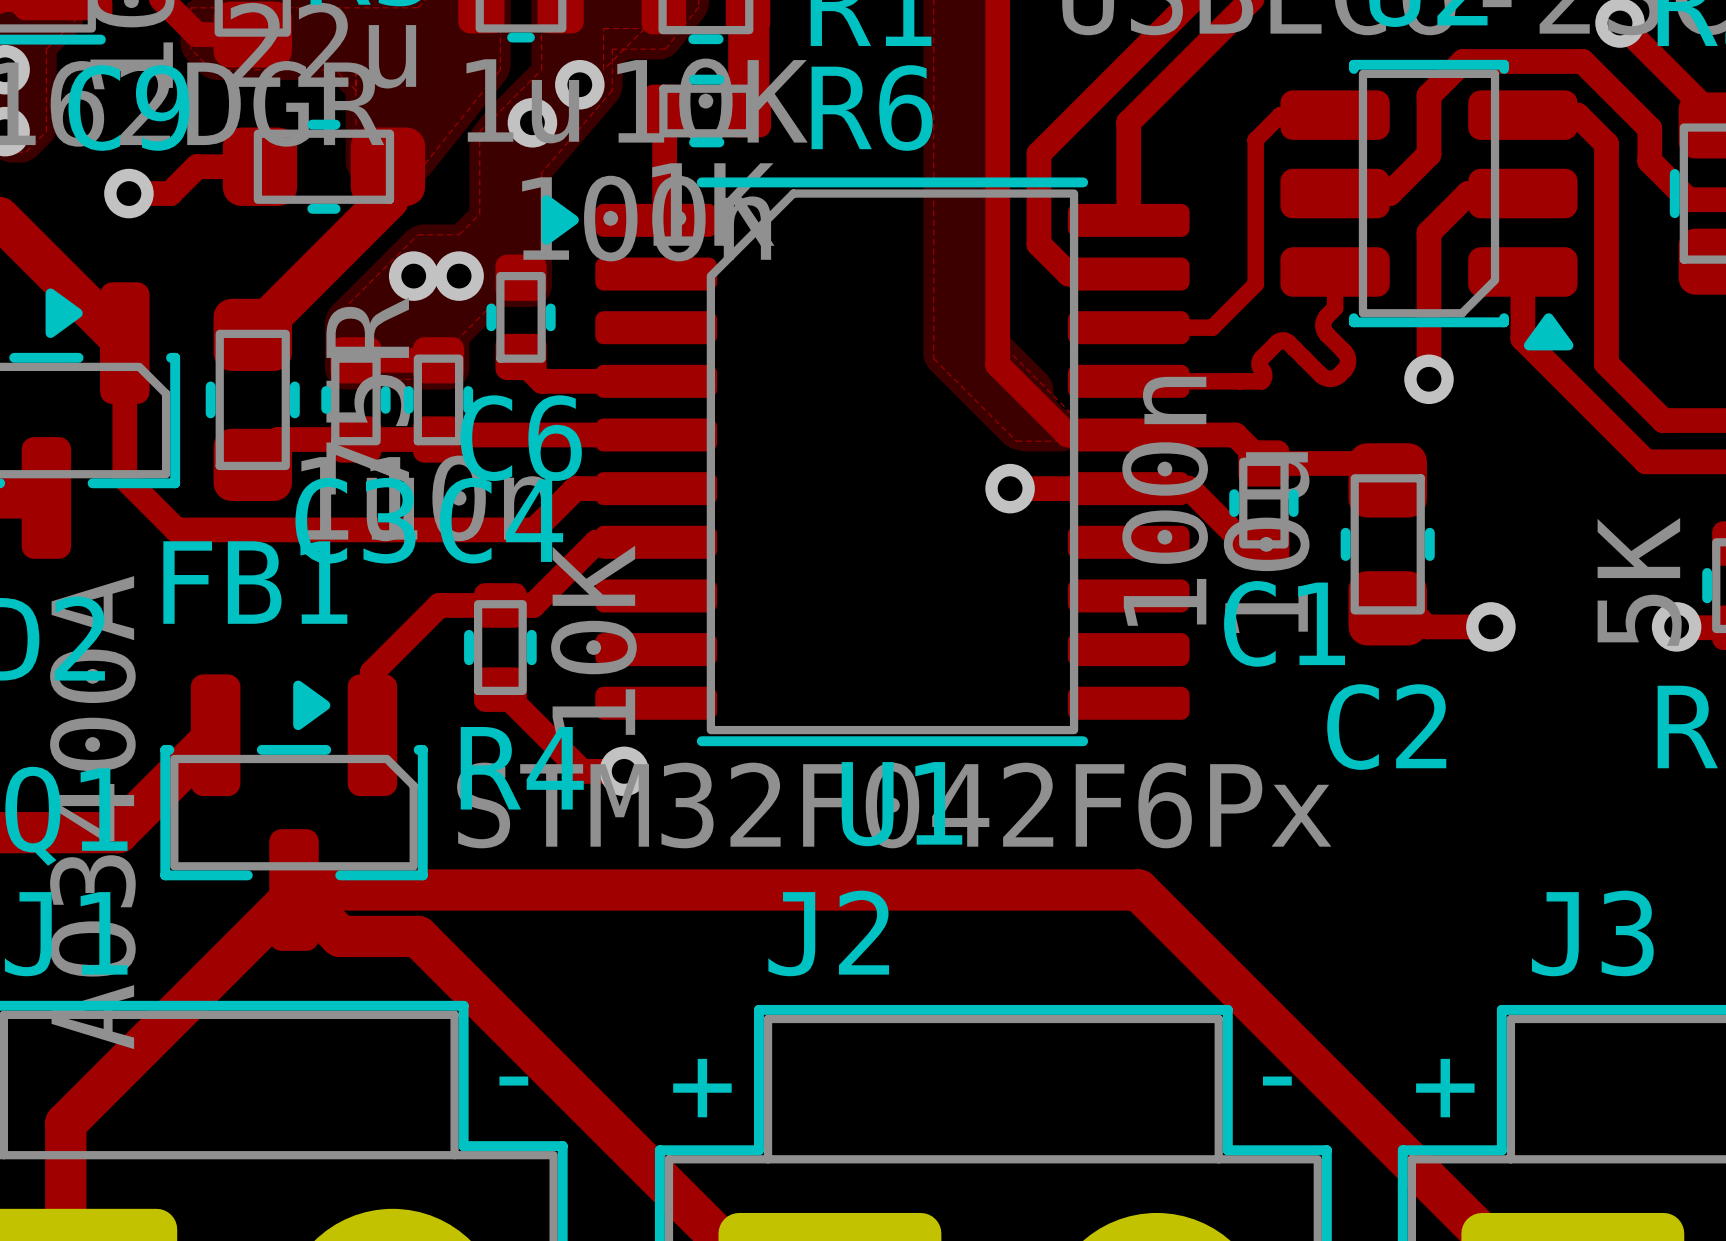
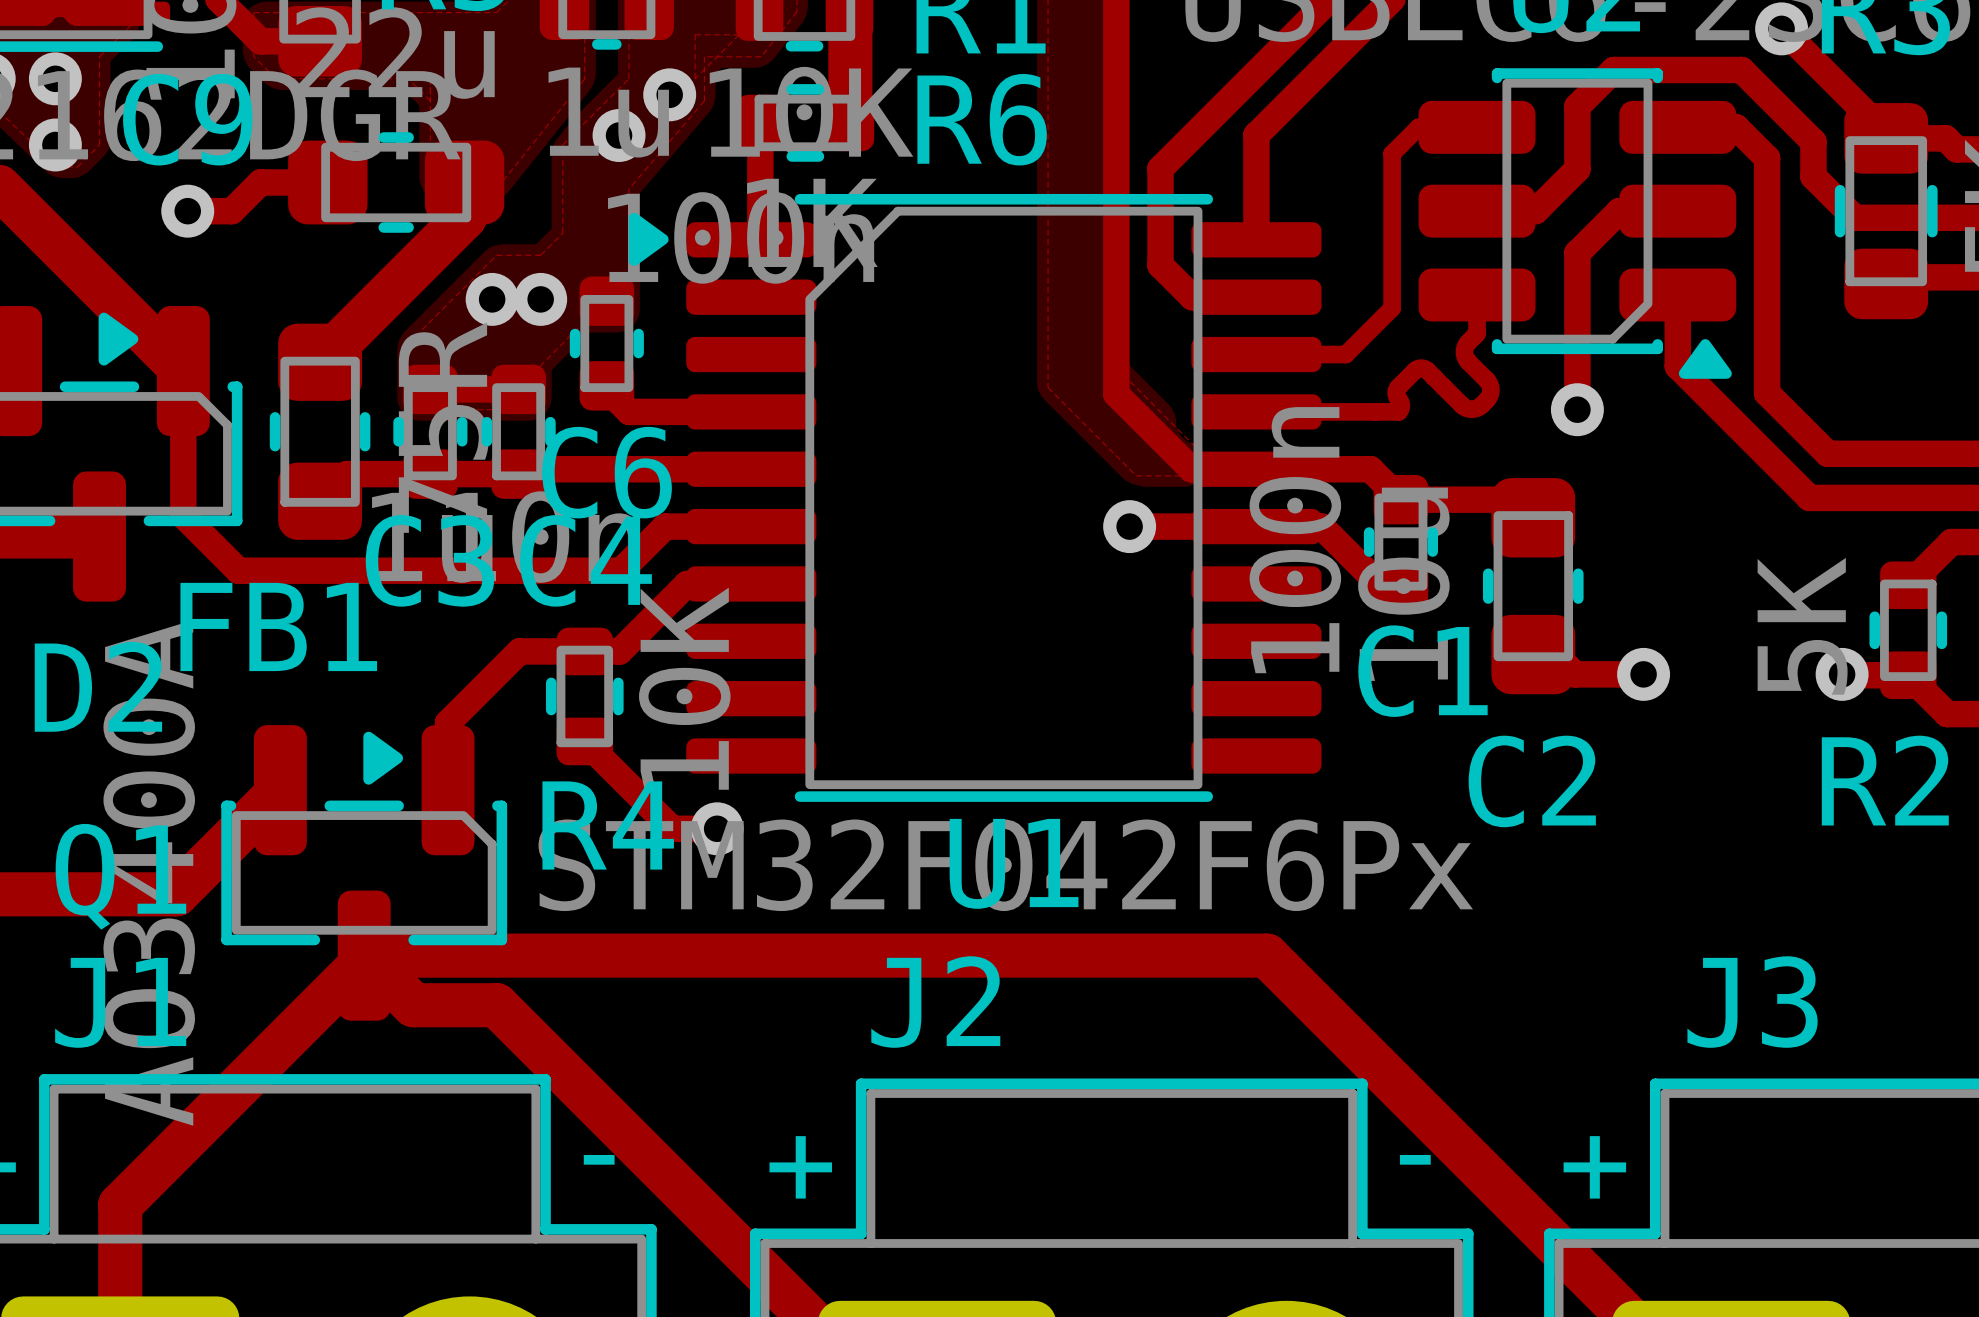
FB1 name position: FB1 (255, 582) -> FB1 (278, 626)

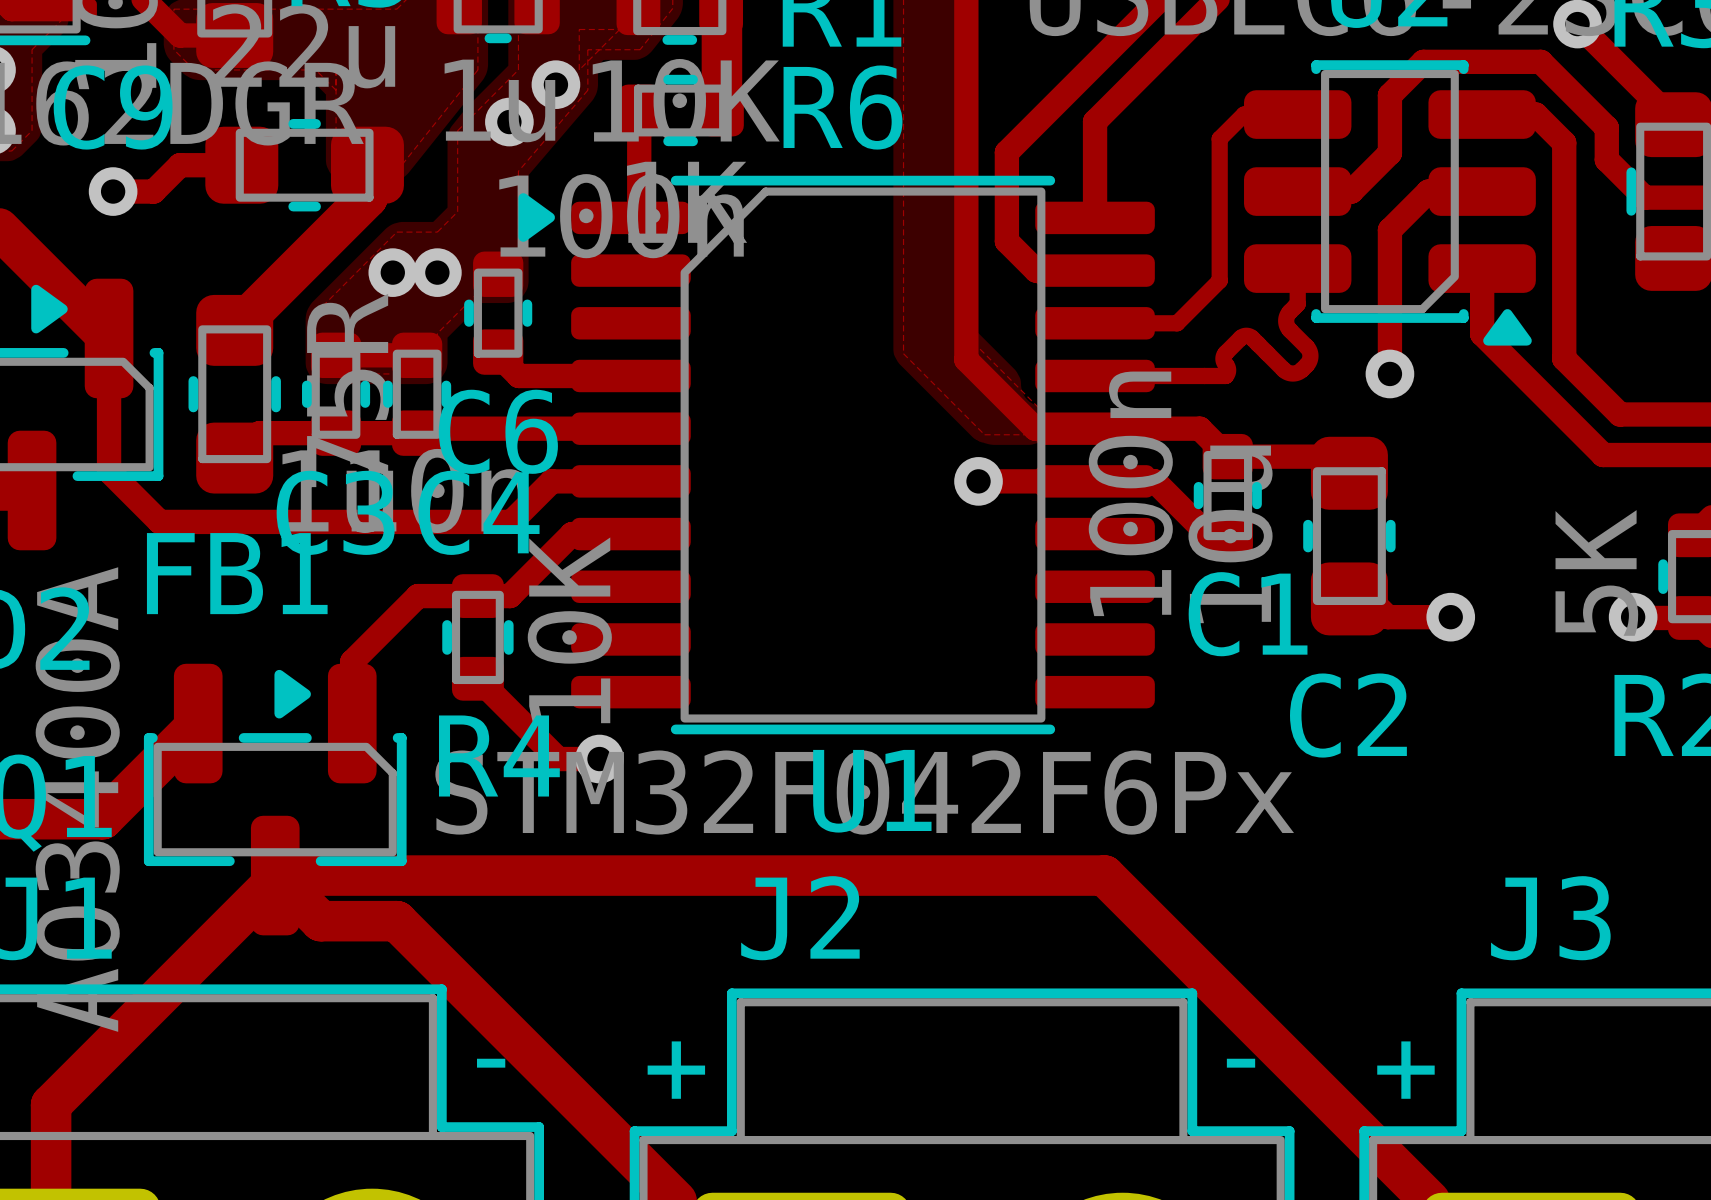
FB1 name position: FB1 (278, 626) -> FB1 (237, 573)

